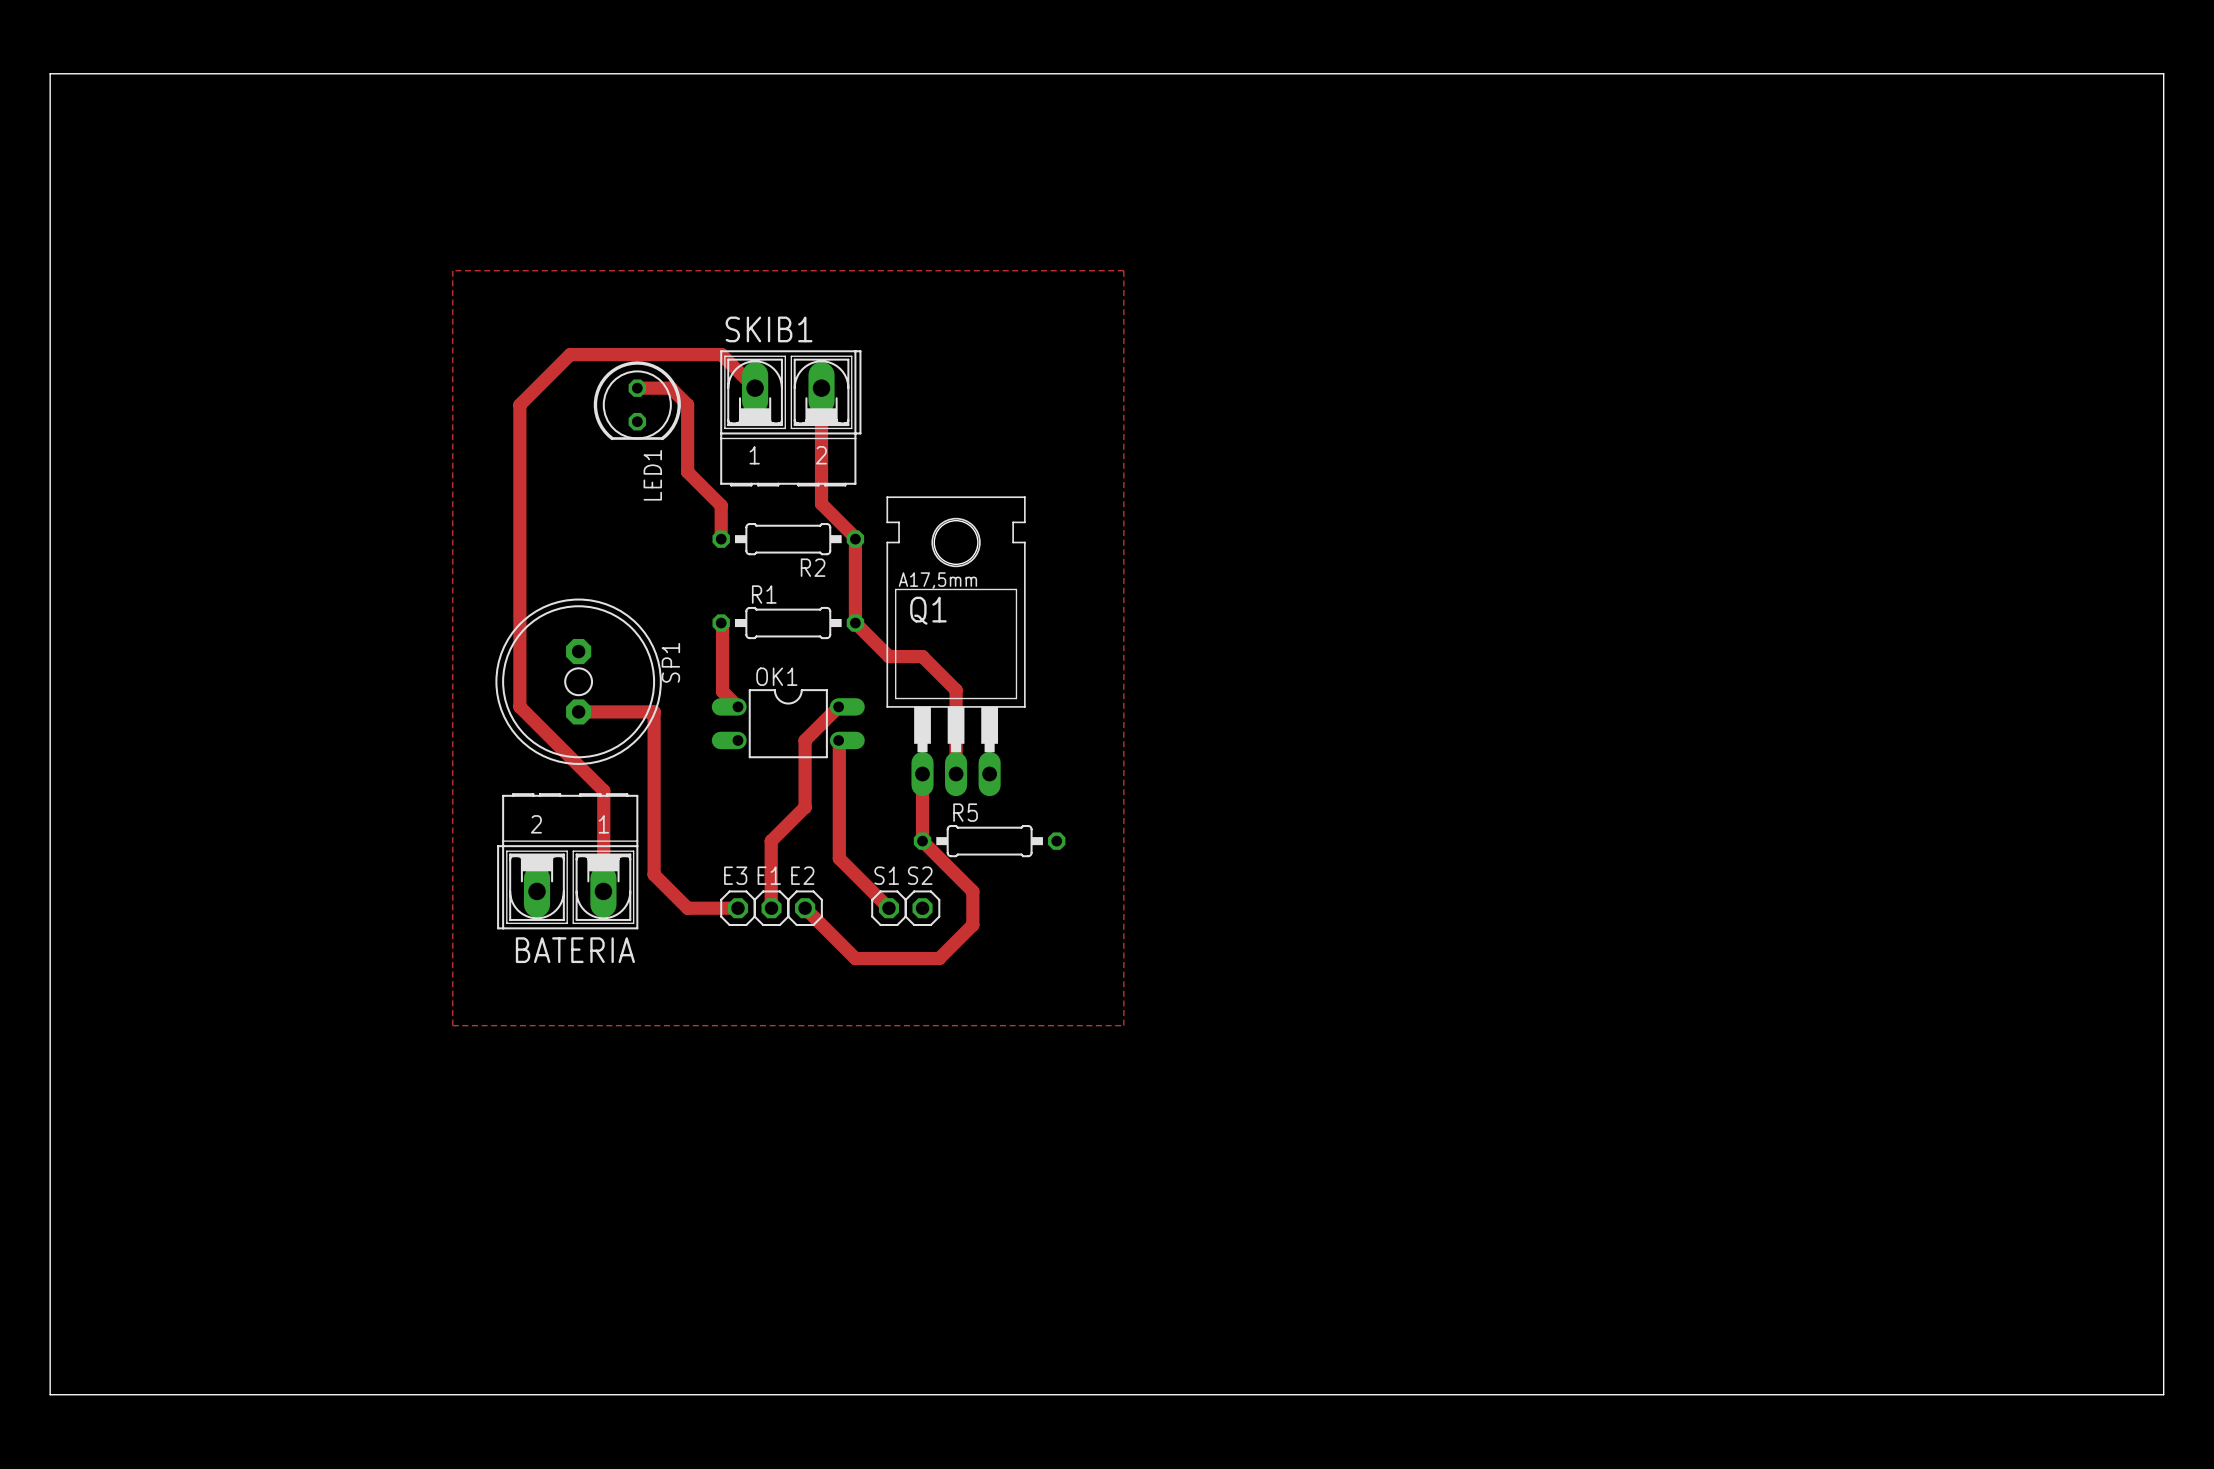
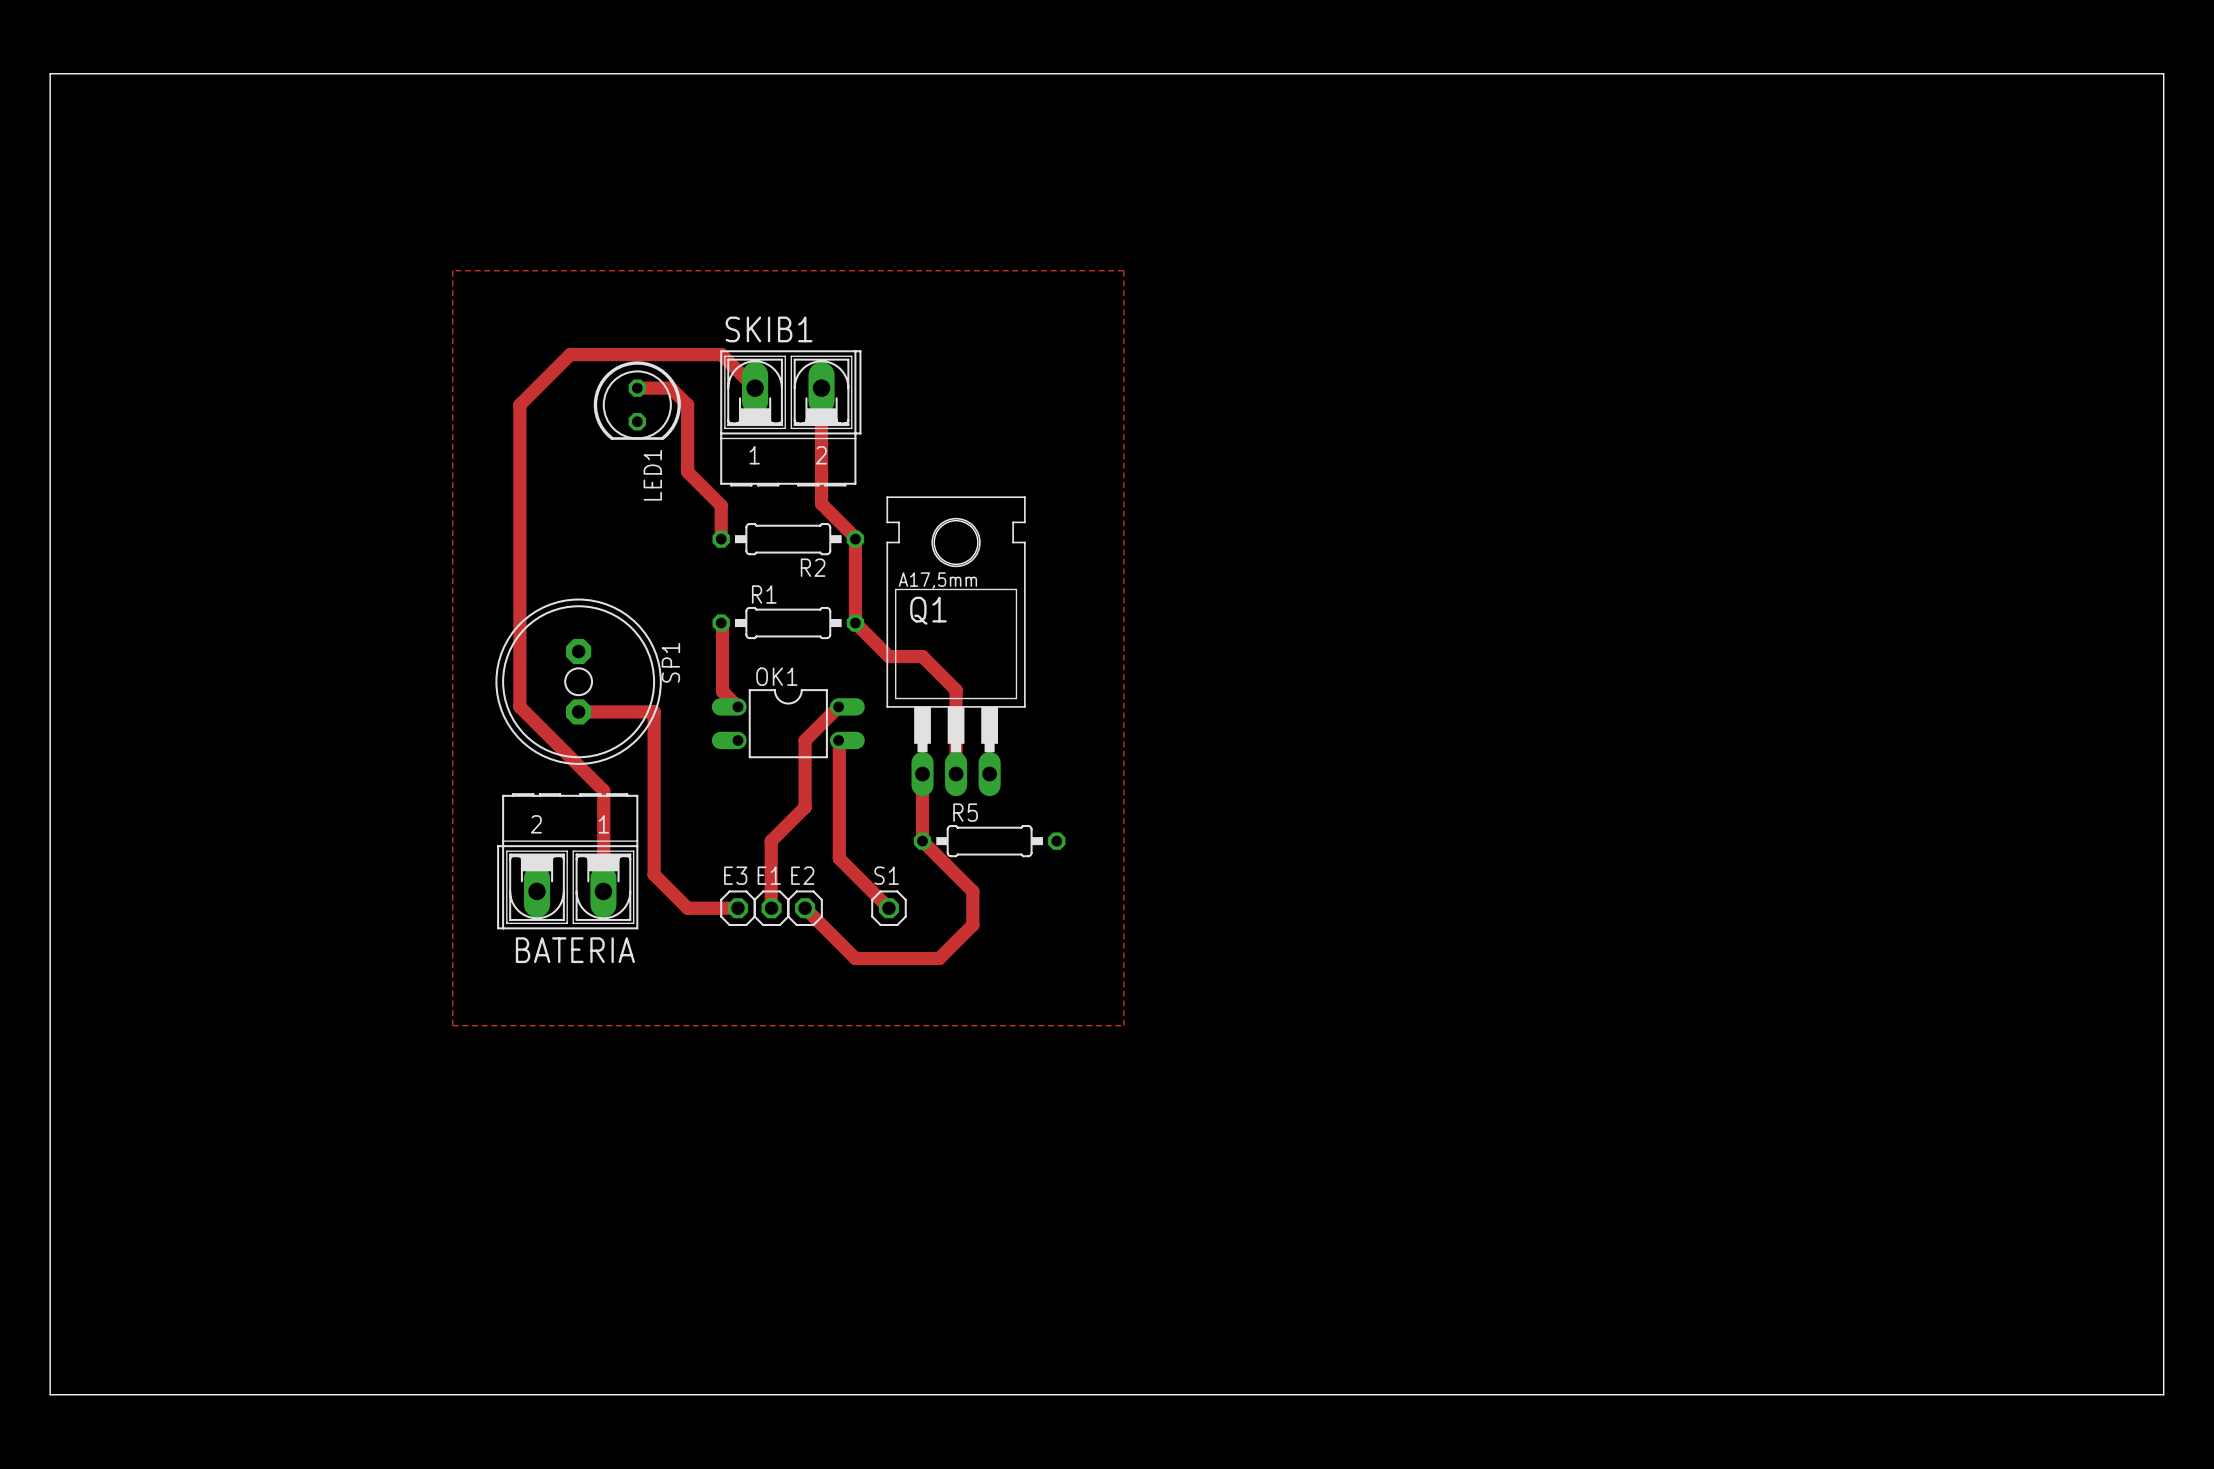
S2: (922, 908) -> none

